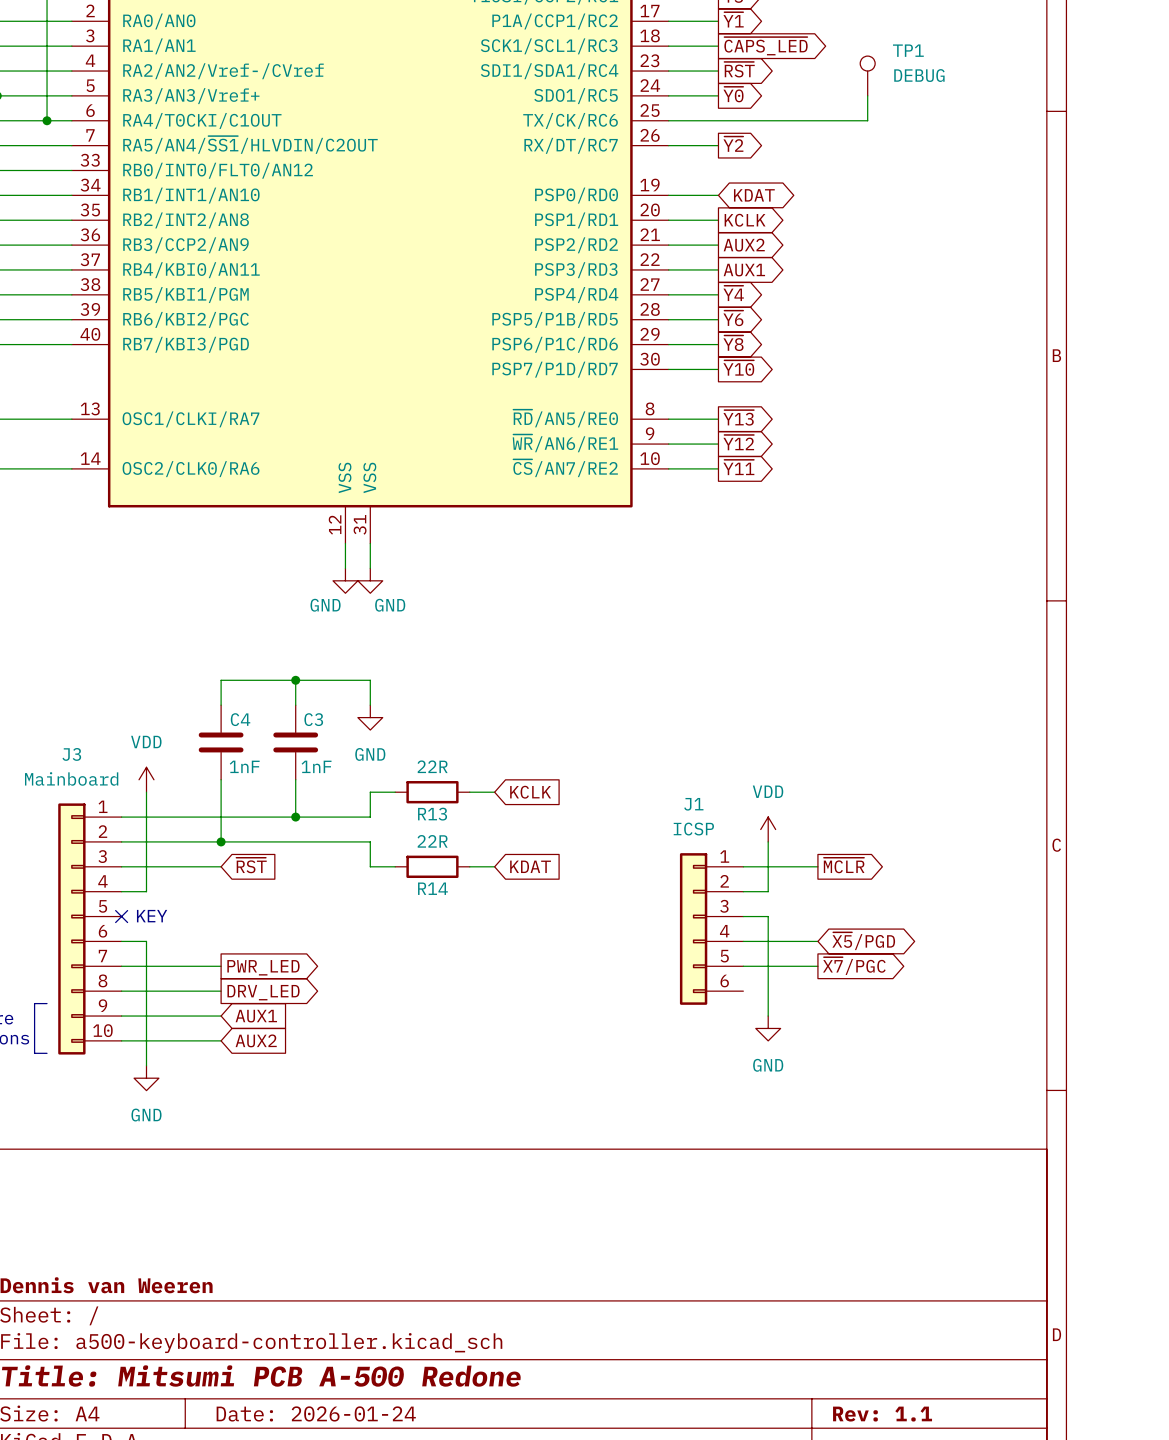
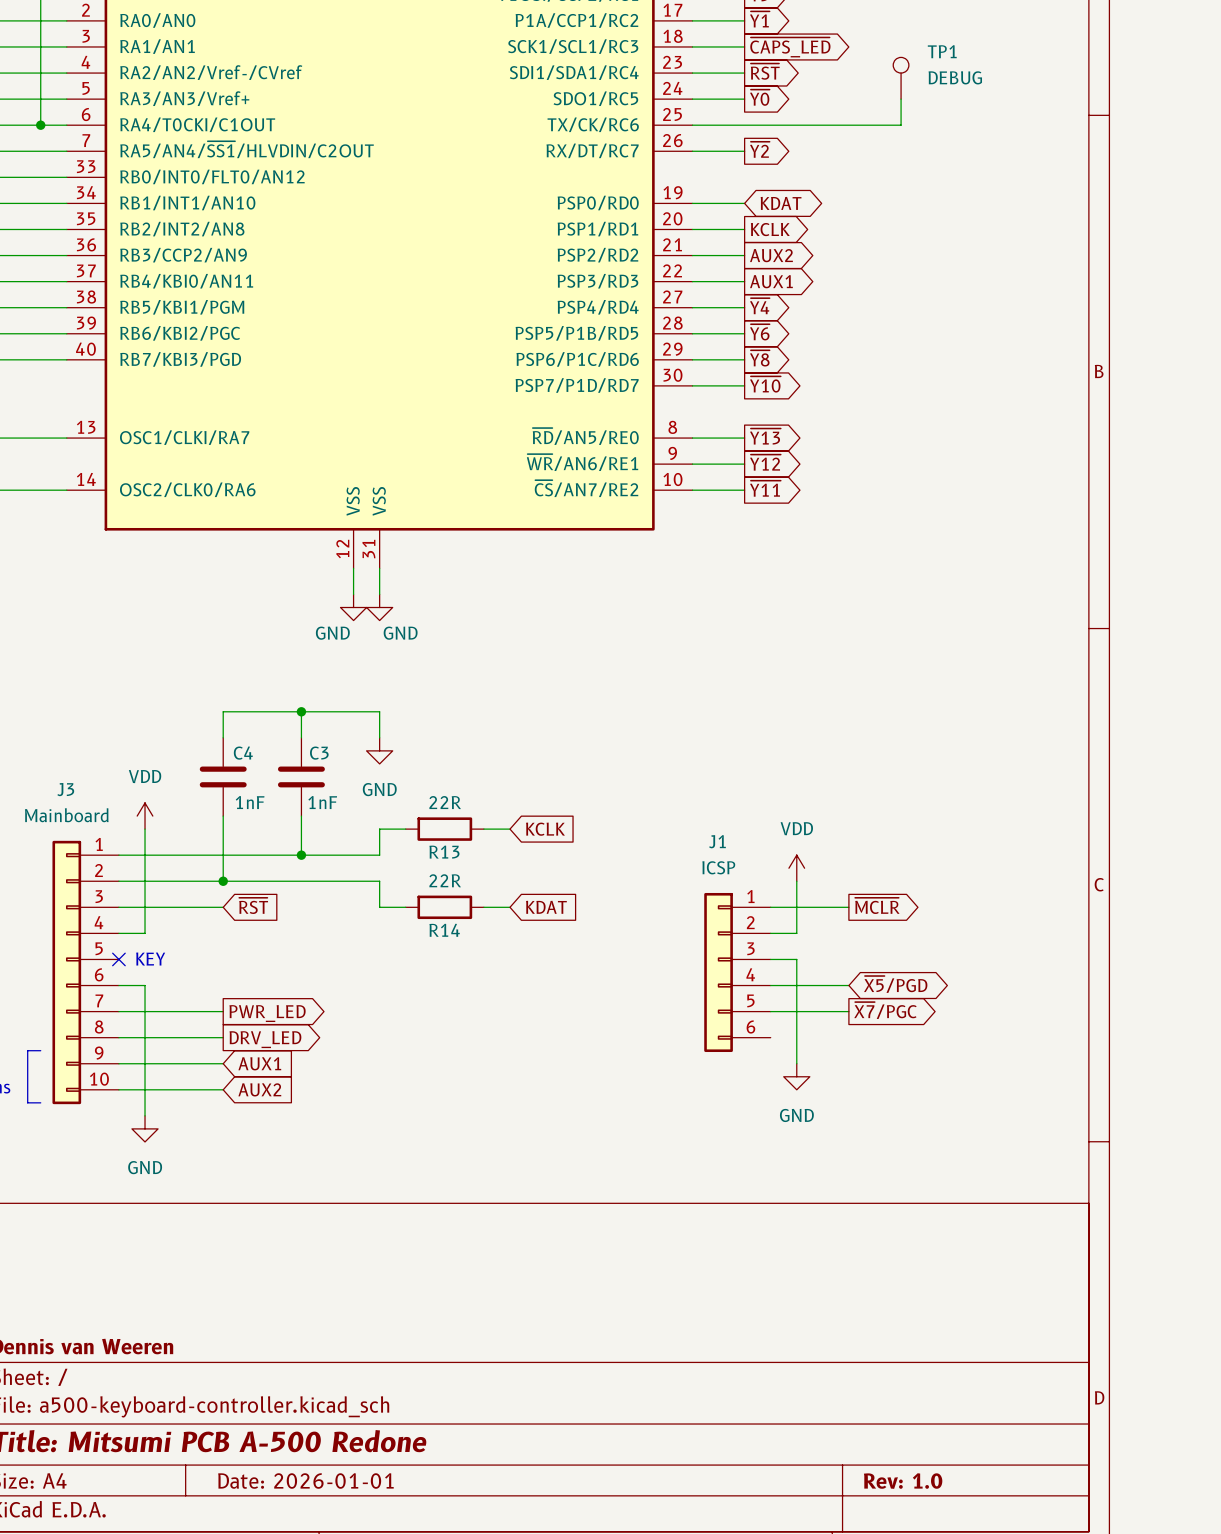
title block: Date: 2026-01-24 (316, 1413) -> Date: 2026-01-01 (305, 1480)
title block: Rev: 1.1 (882, 1414) -> Rev: 1.0 (903, 1481)

